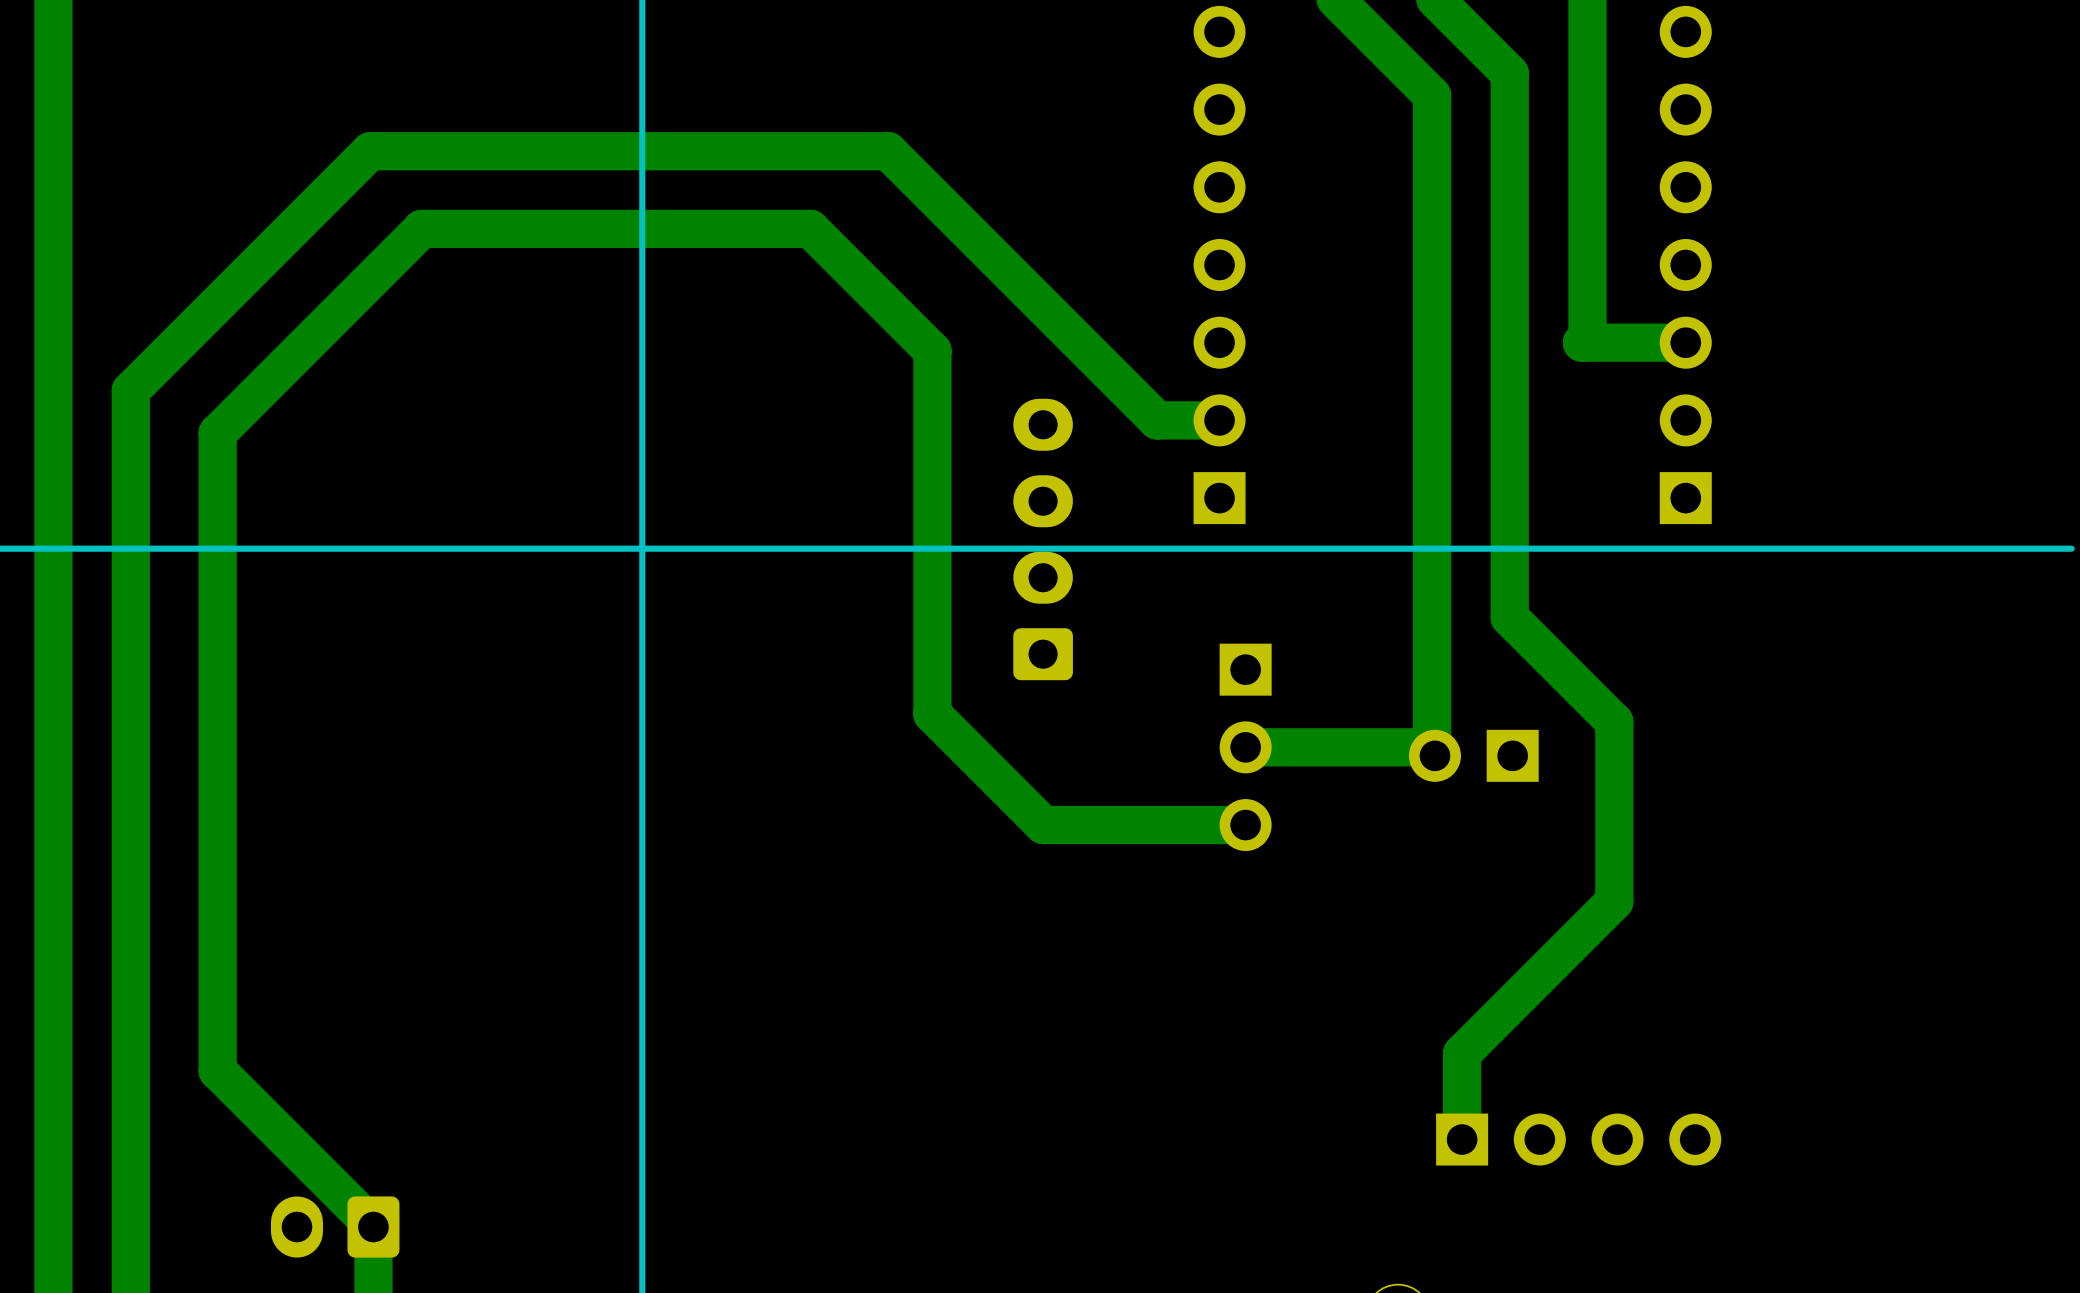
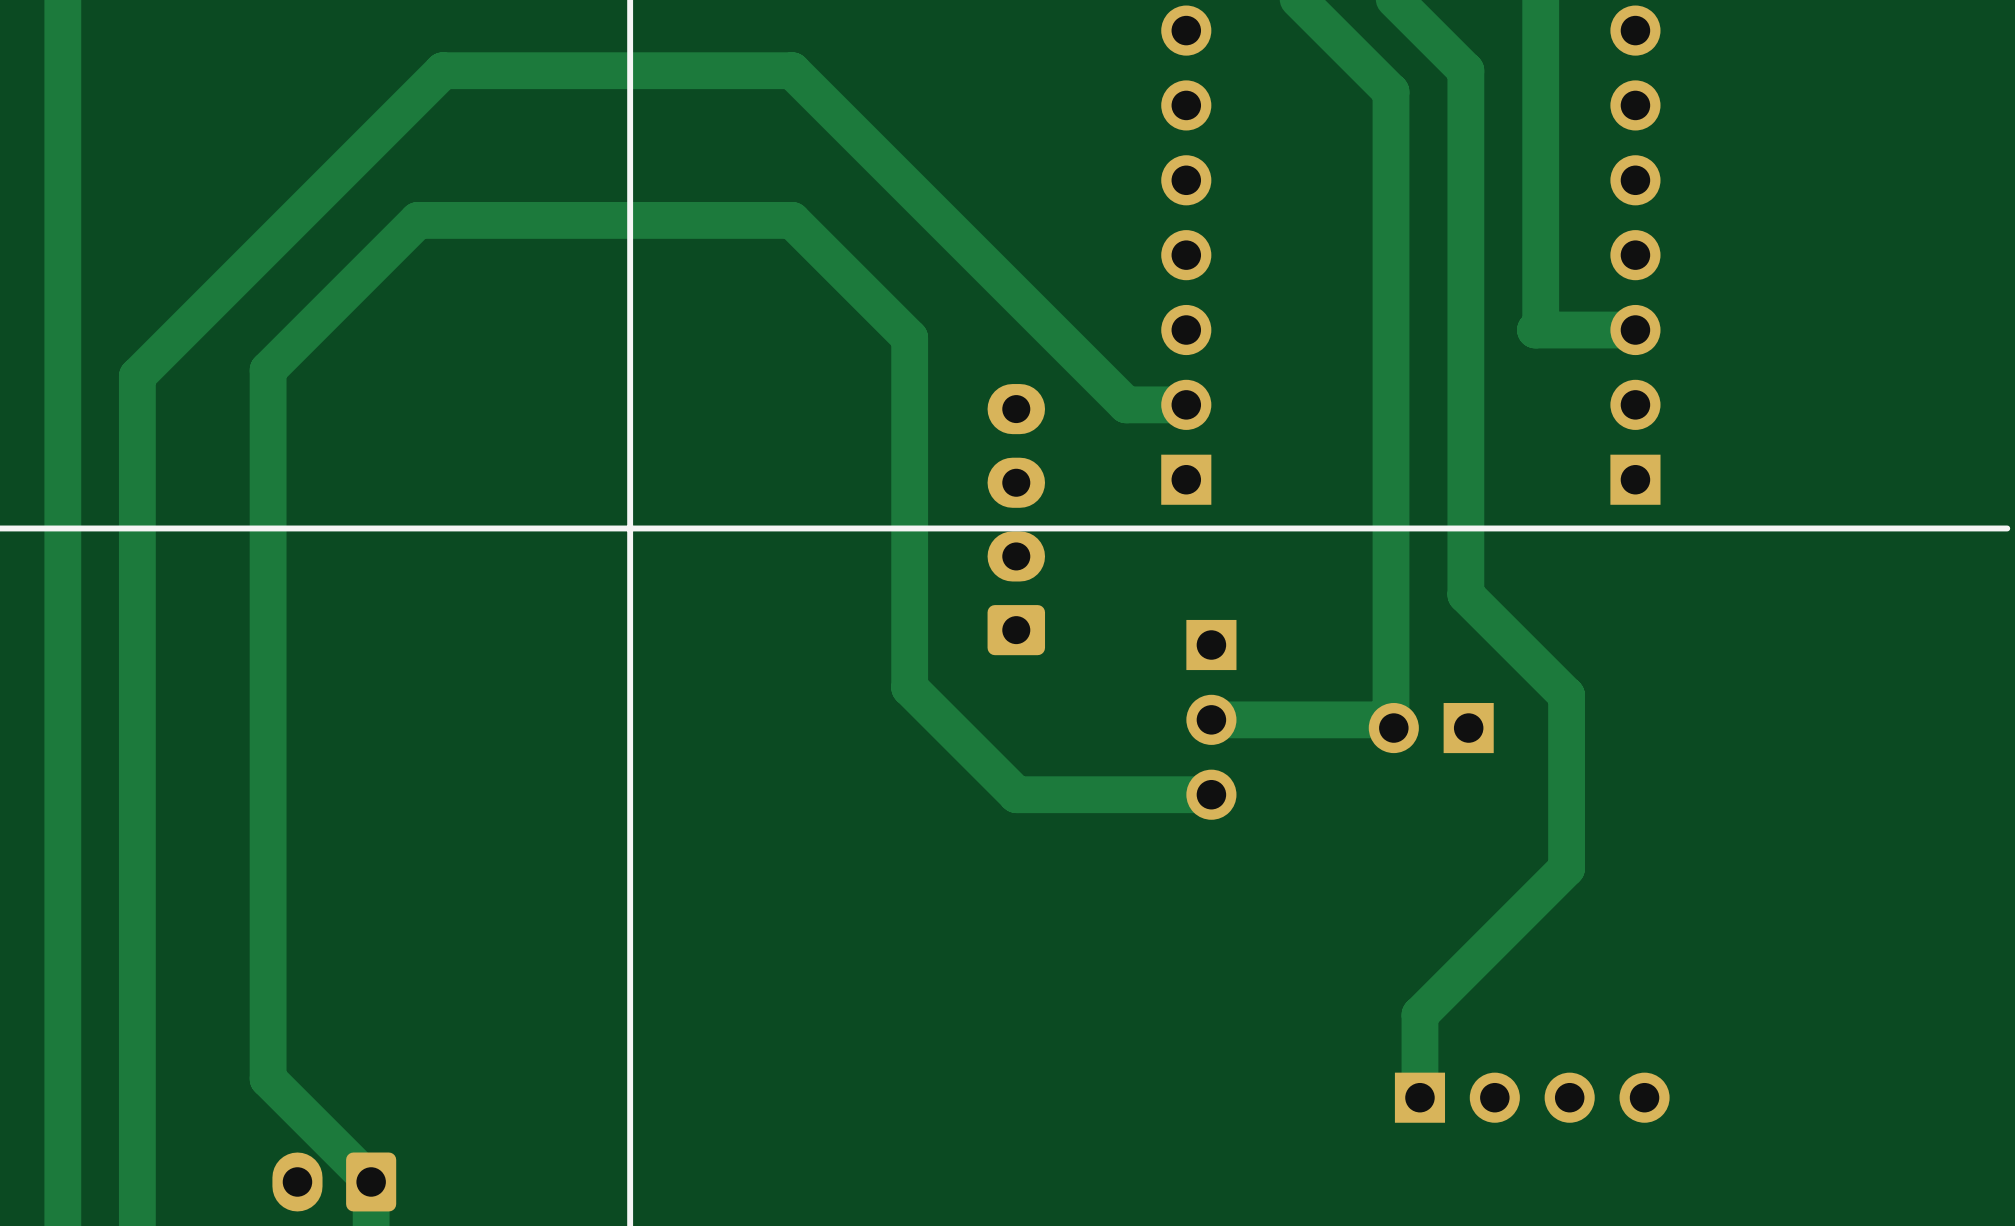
track: (888, 151) (370, 151) -> (866, 145) (792, 70) (442, 70) (368, 145)
track: (266, 384) (217, 433) (217, 1070) (373, 1226) -> (268, 370) (268, 1078) (371, 1181)

